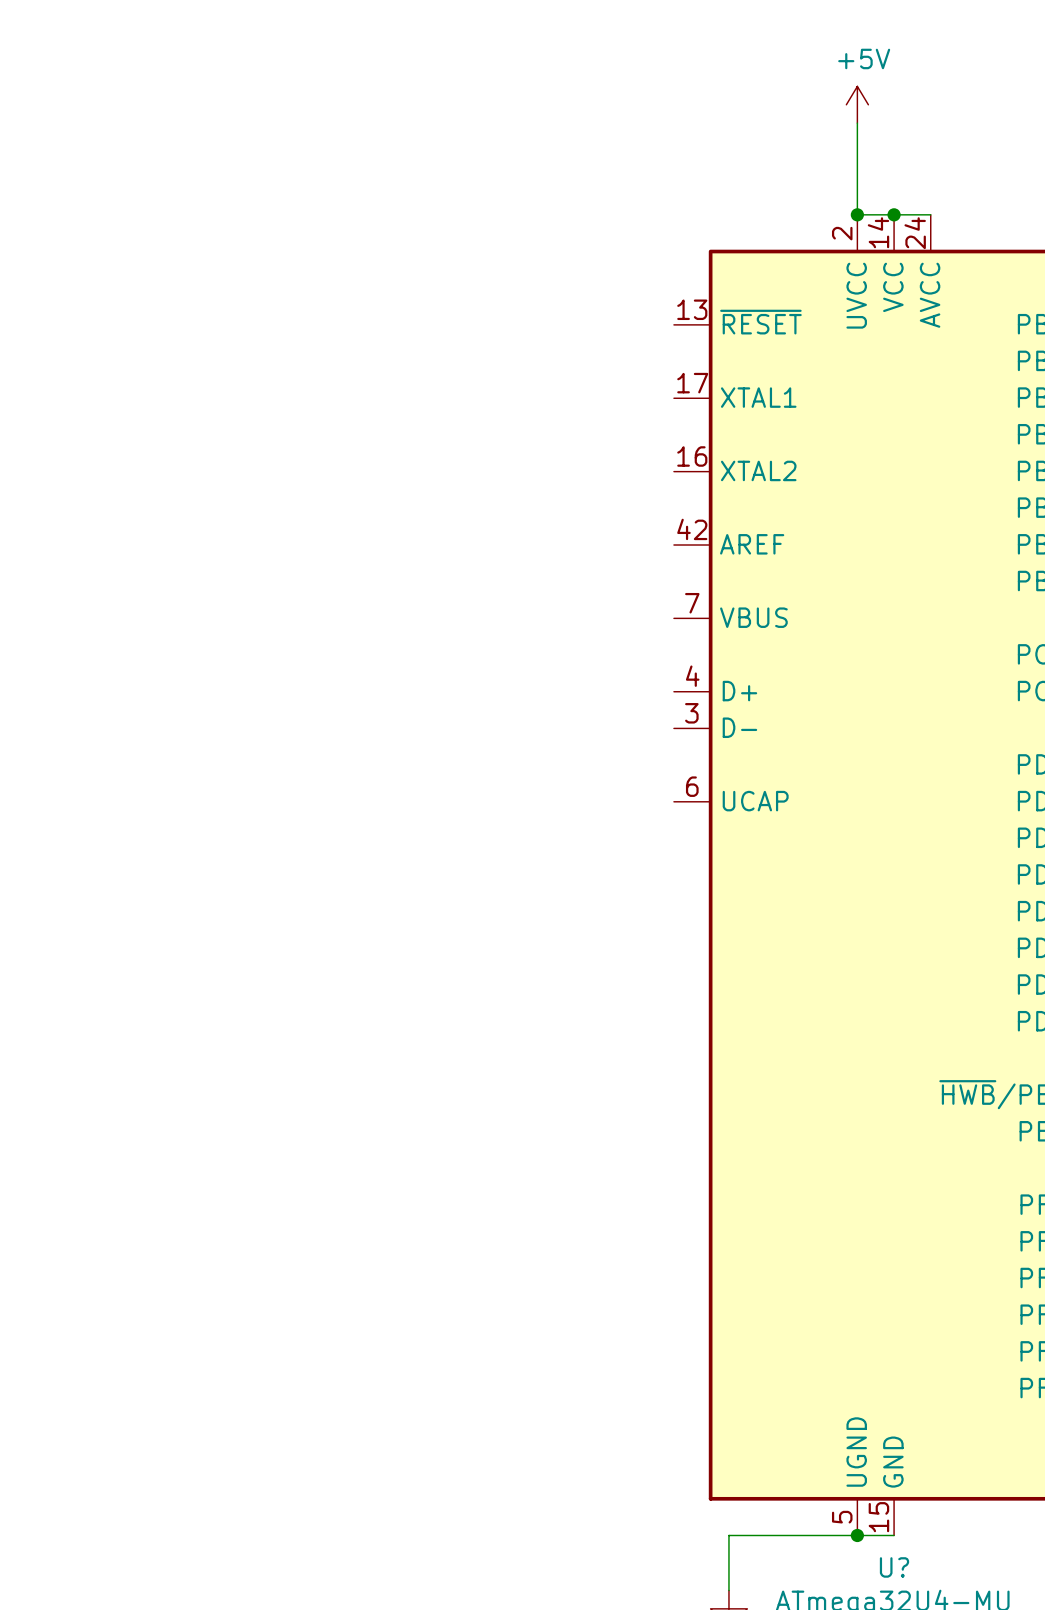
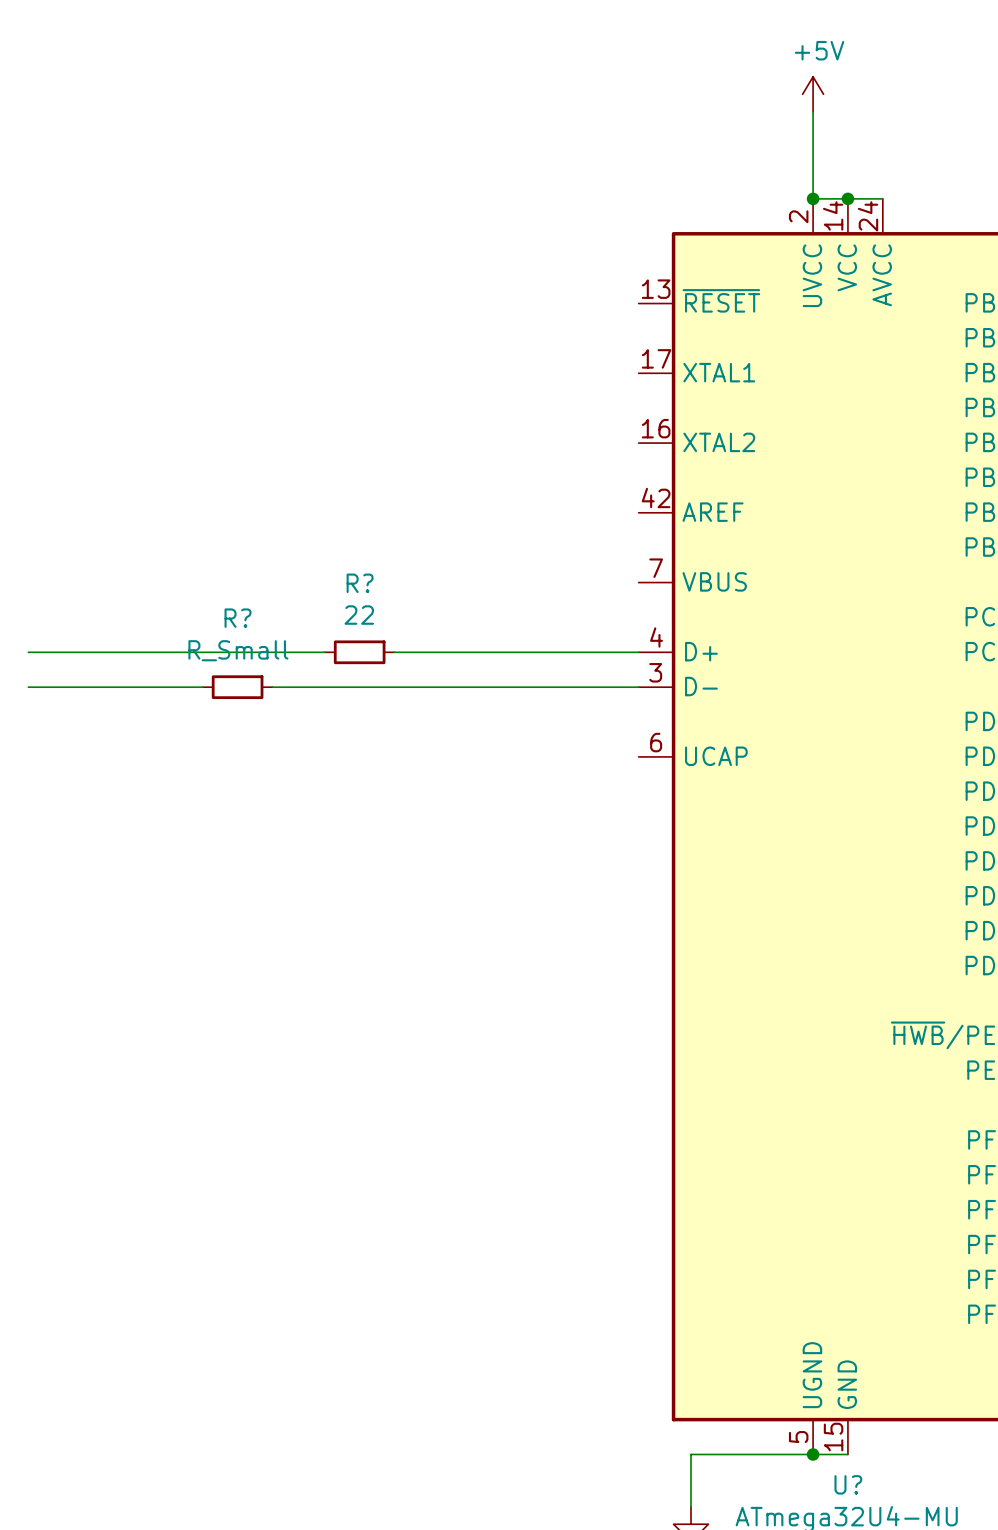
wire: none -> (28, 652) (324, 652)
R?: none -> 22 (359, 652)
wire: none -> (394, 652) (638, 652)
wire: none -> (28, 687) (202, 687)
R?: none -> R_Small (237, 687)
wire: none -> (272, 687) (638, 687)

